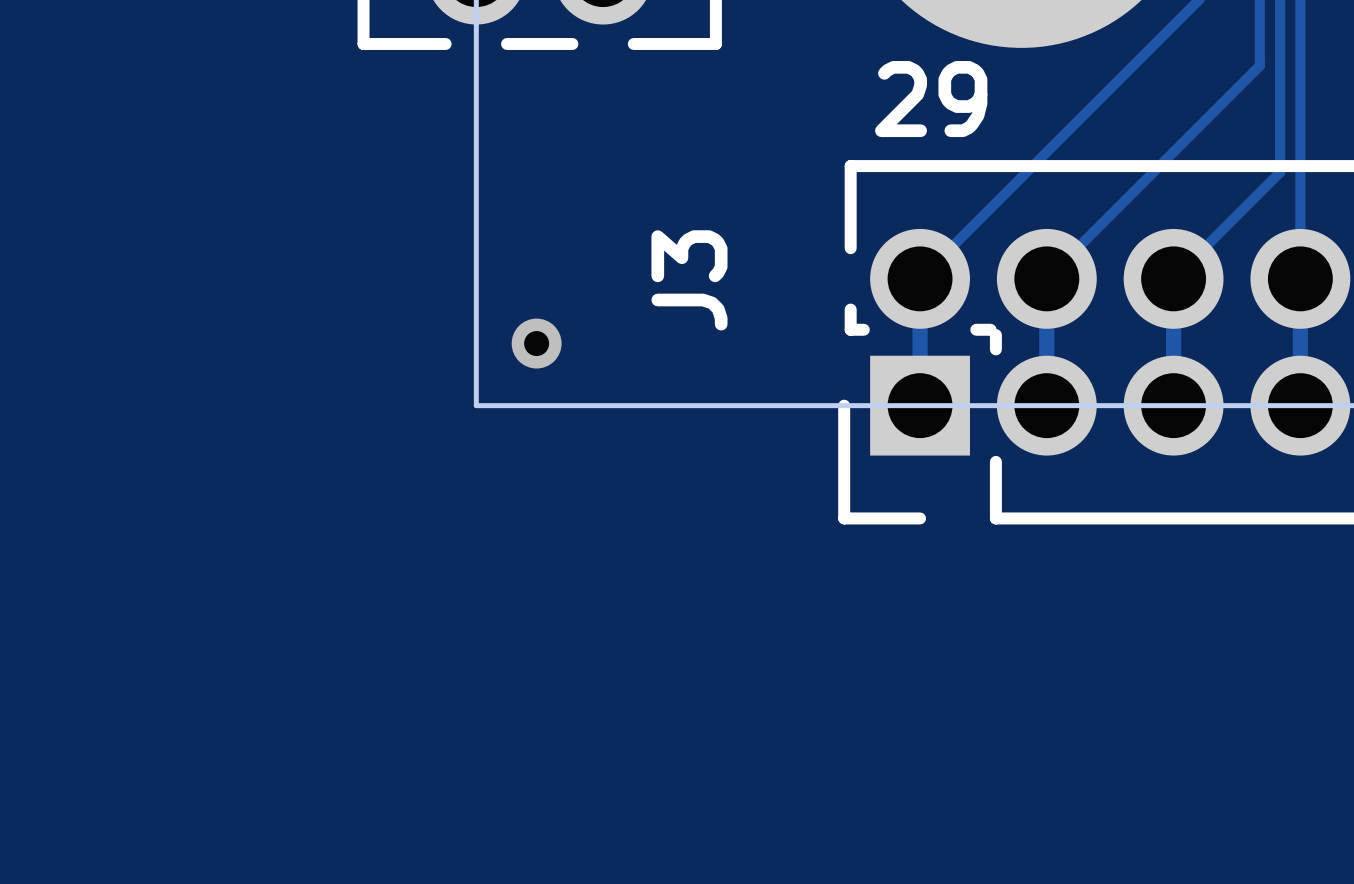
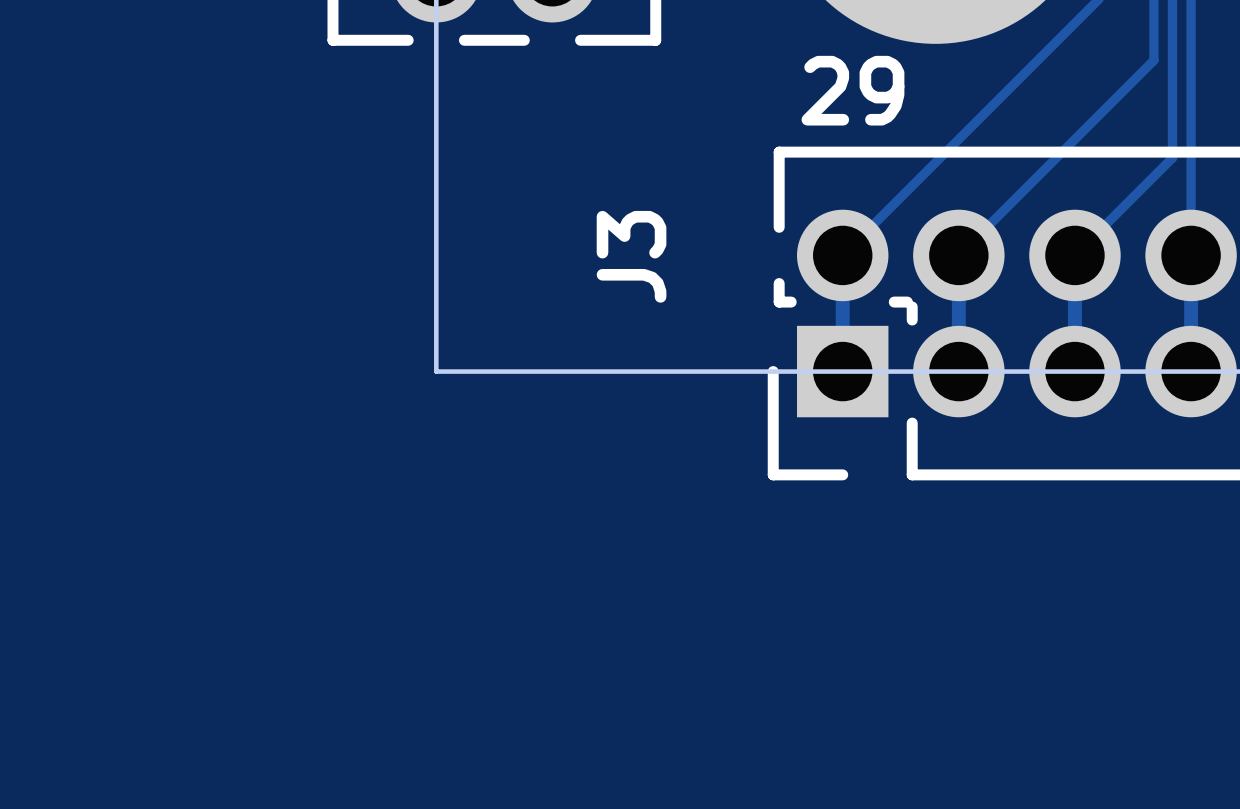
via: (536, 343) -> none

